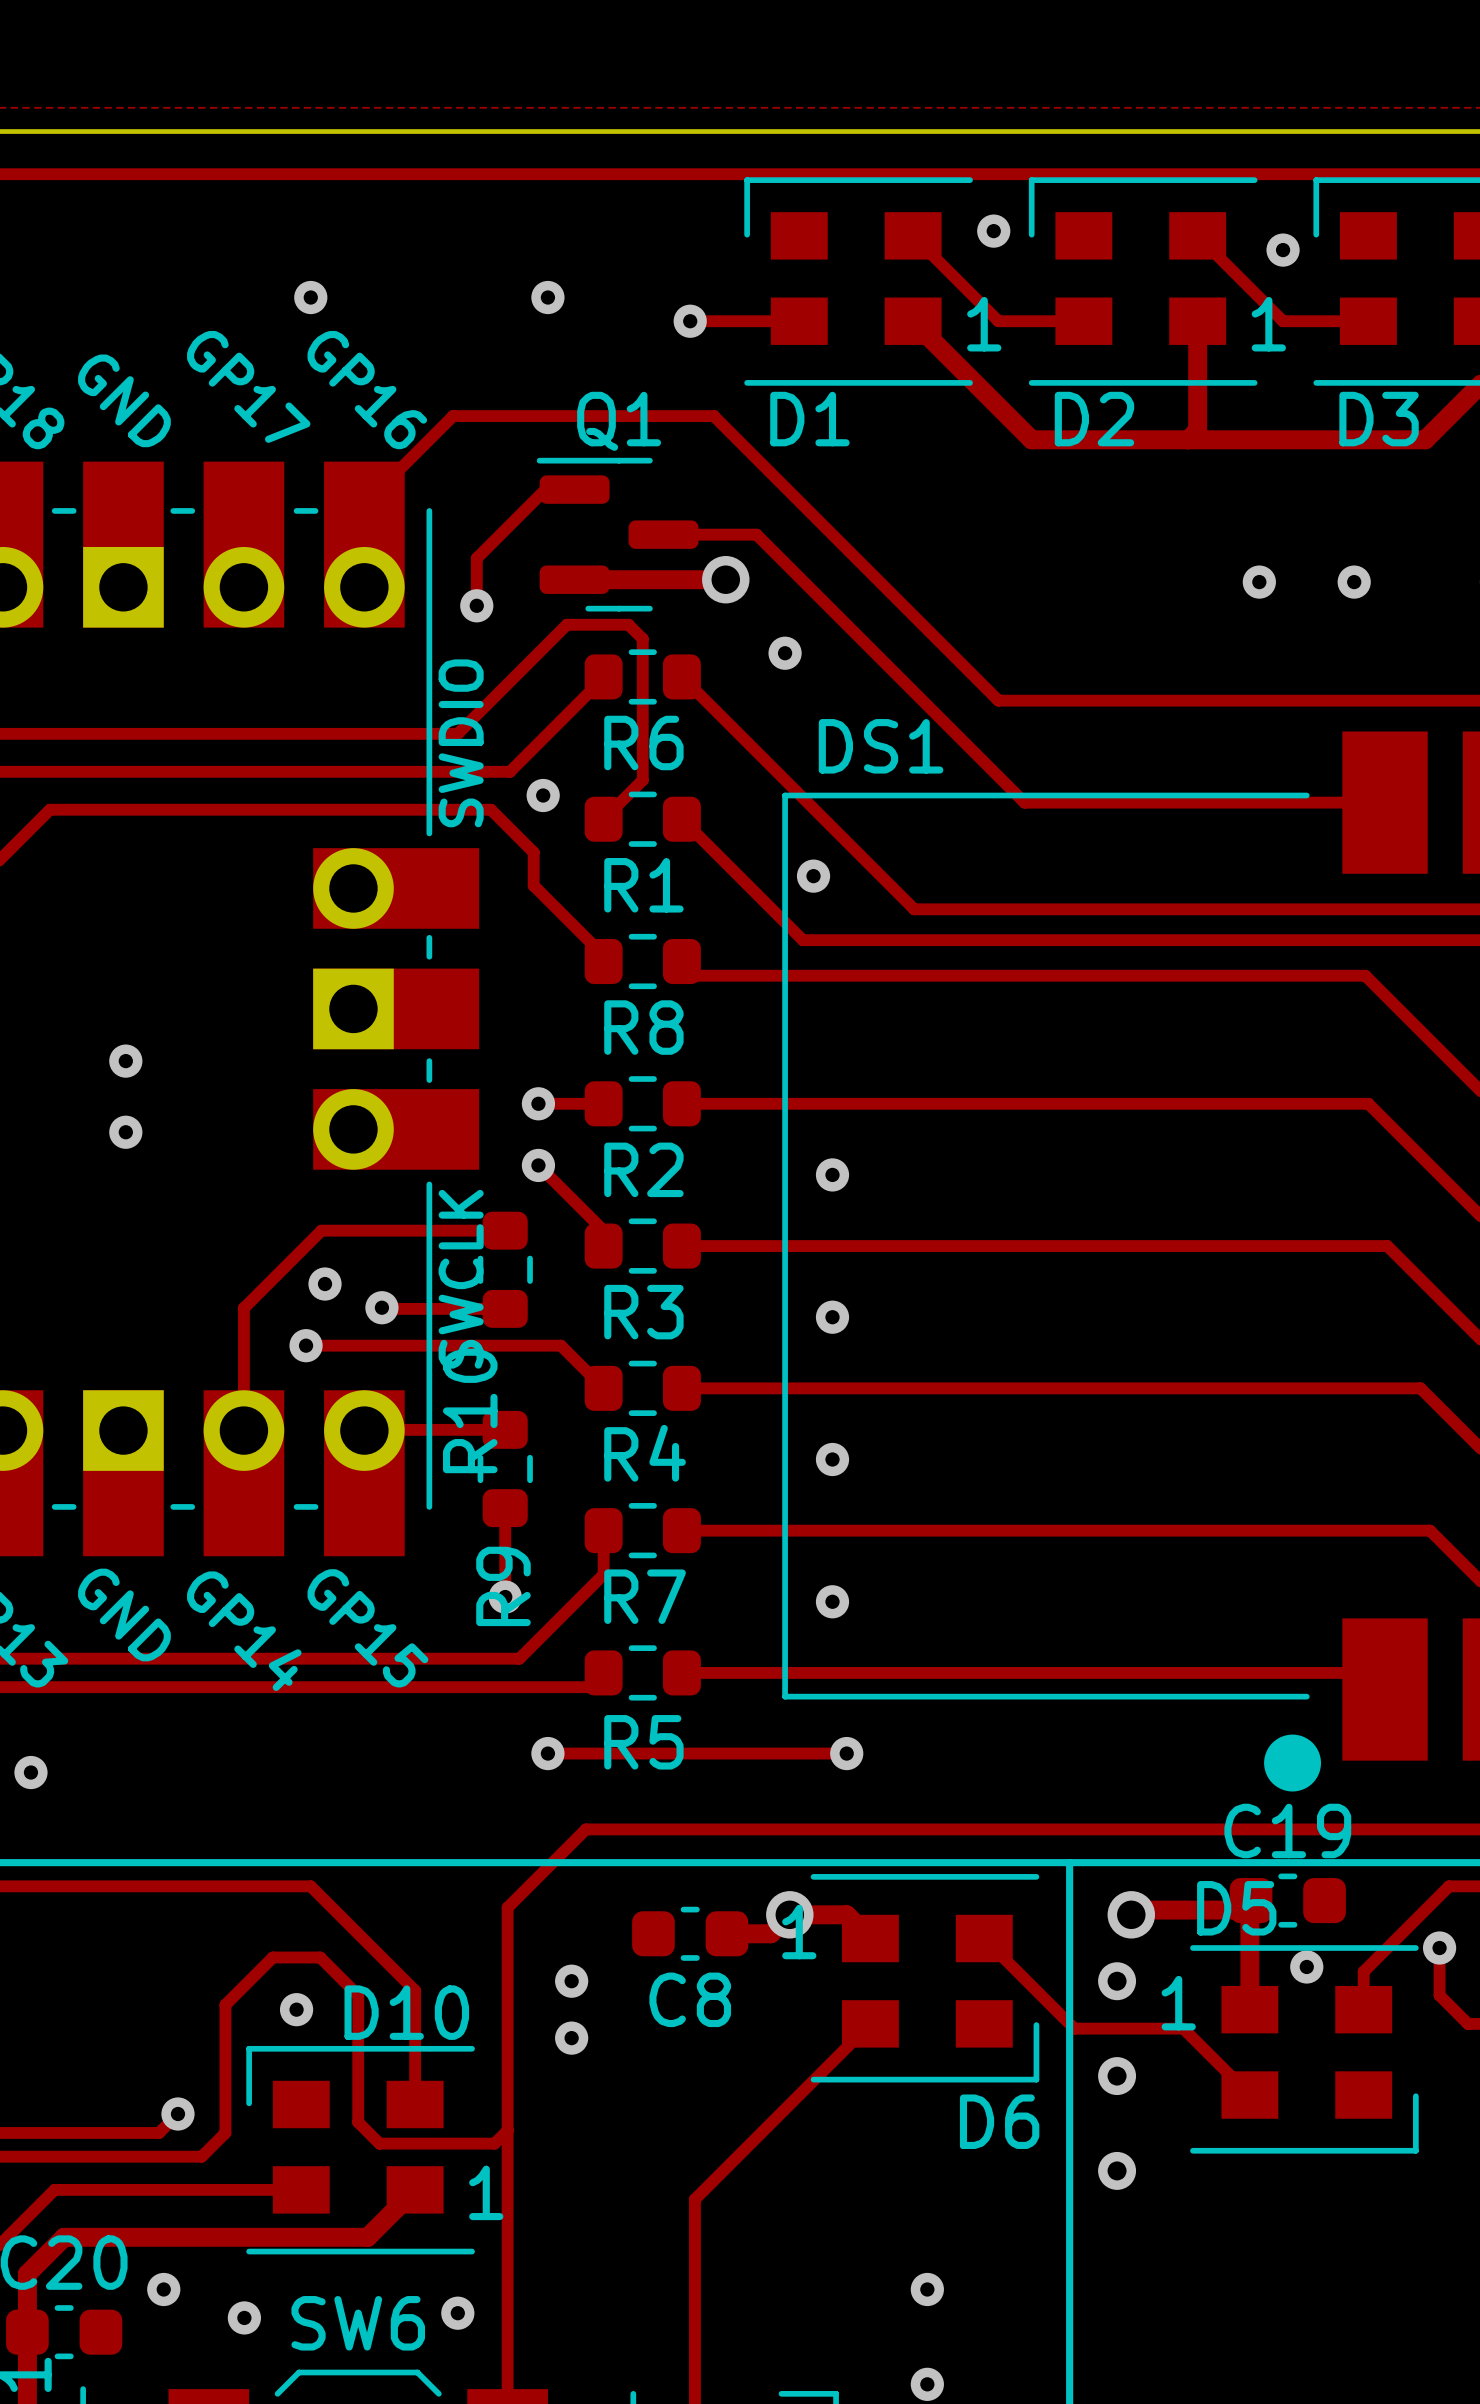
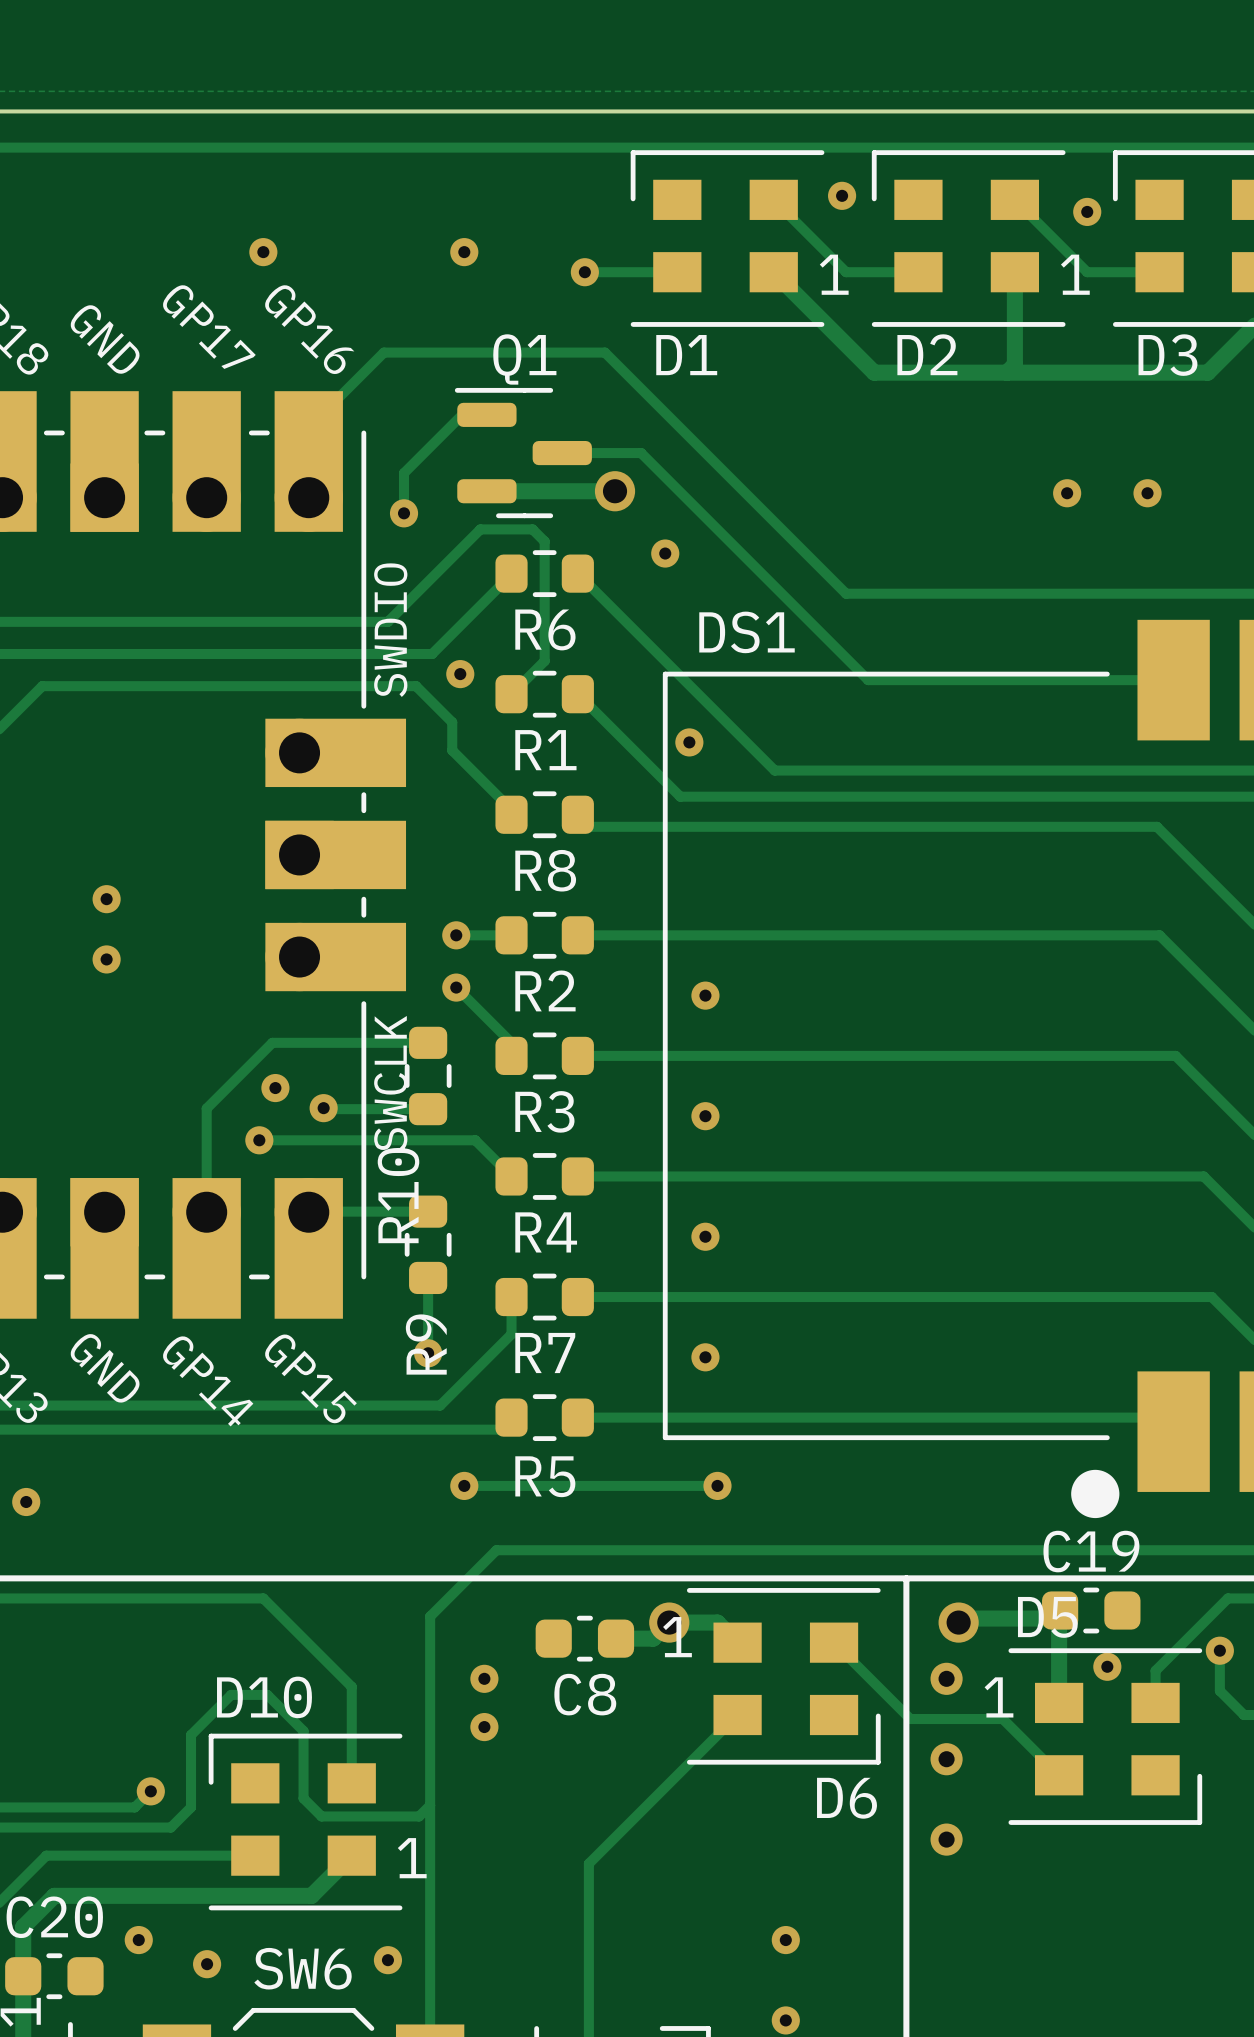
via: (296, 2009) -> none
D10 name position: D10 (406, 2012) -> D10 (264, 1697)
track: (358, 2042) (358, 1995) (320, 1957) (272, 1957) (225, 2004) (225, 2047) -> (303, 1731) (267, 1694) (231, 1694) (191, 1735)

